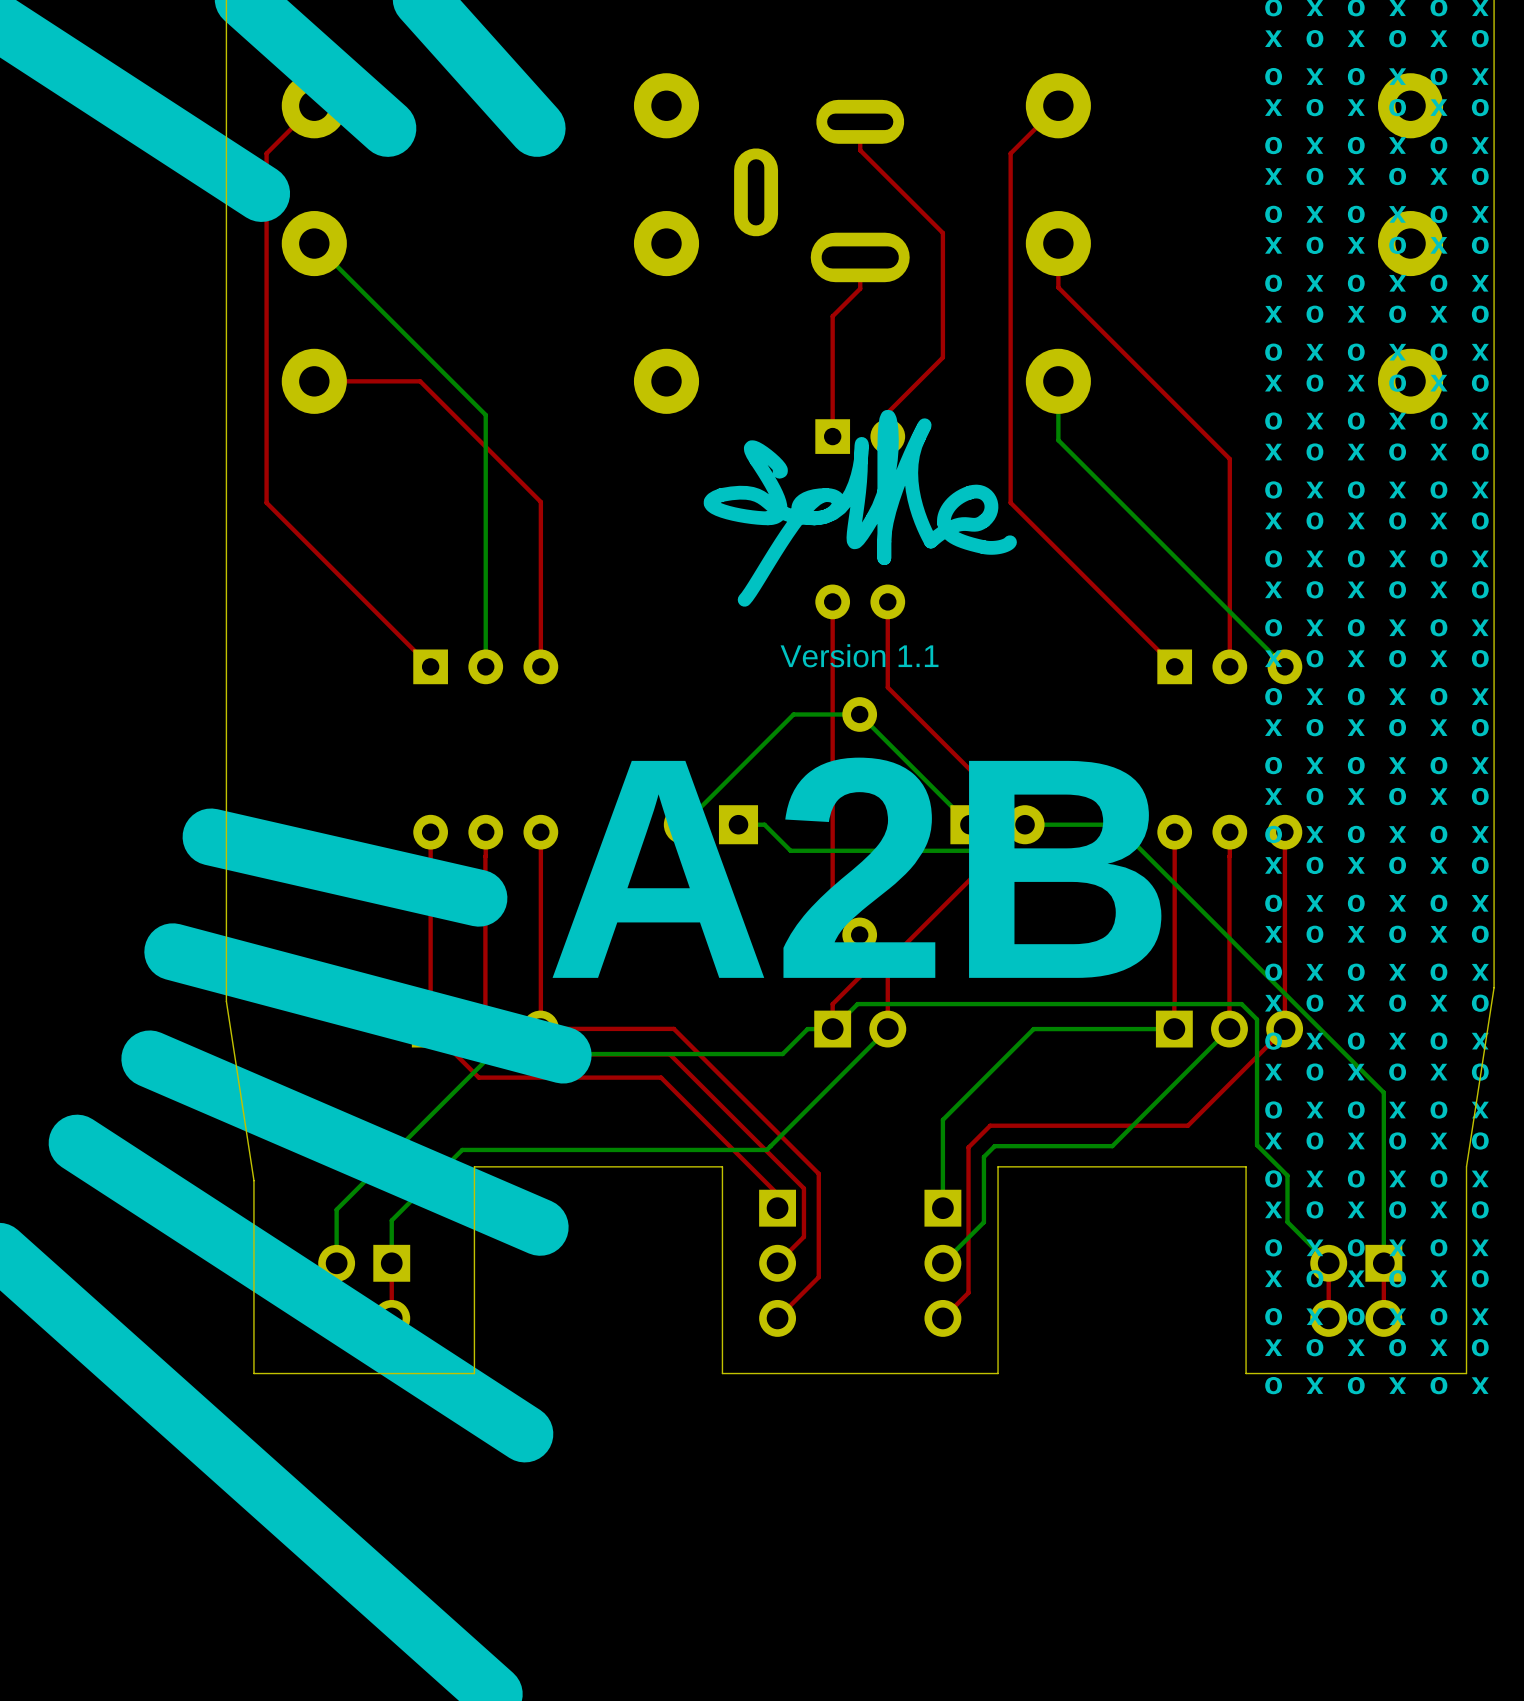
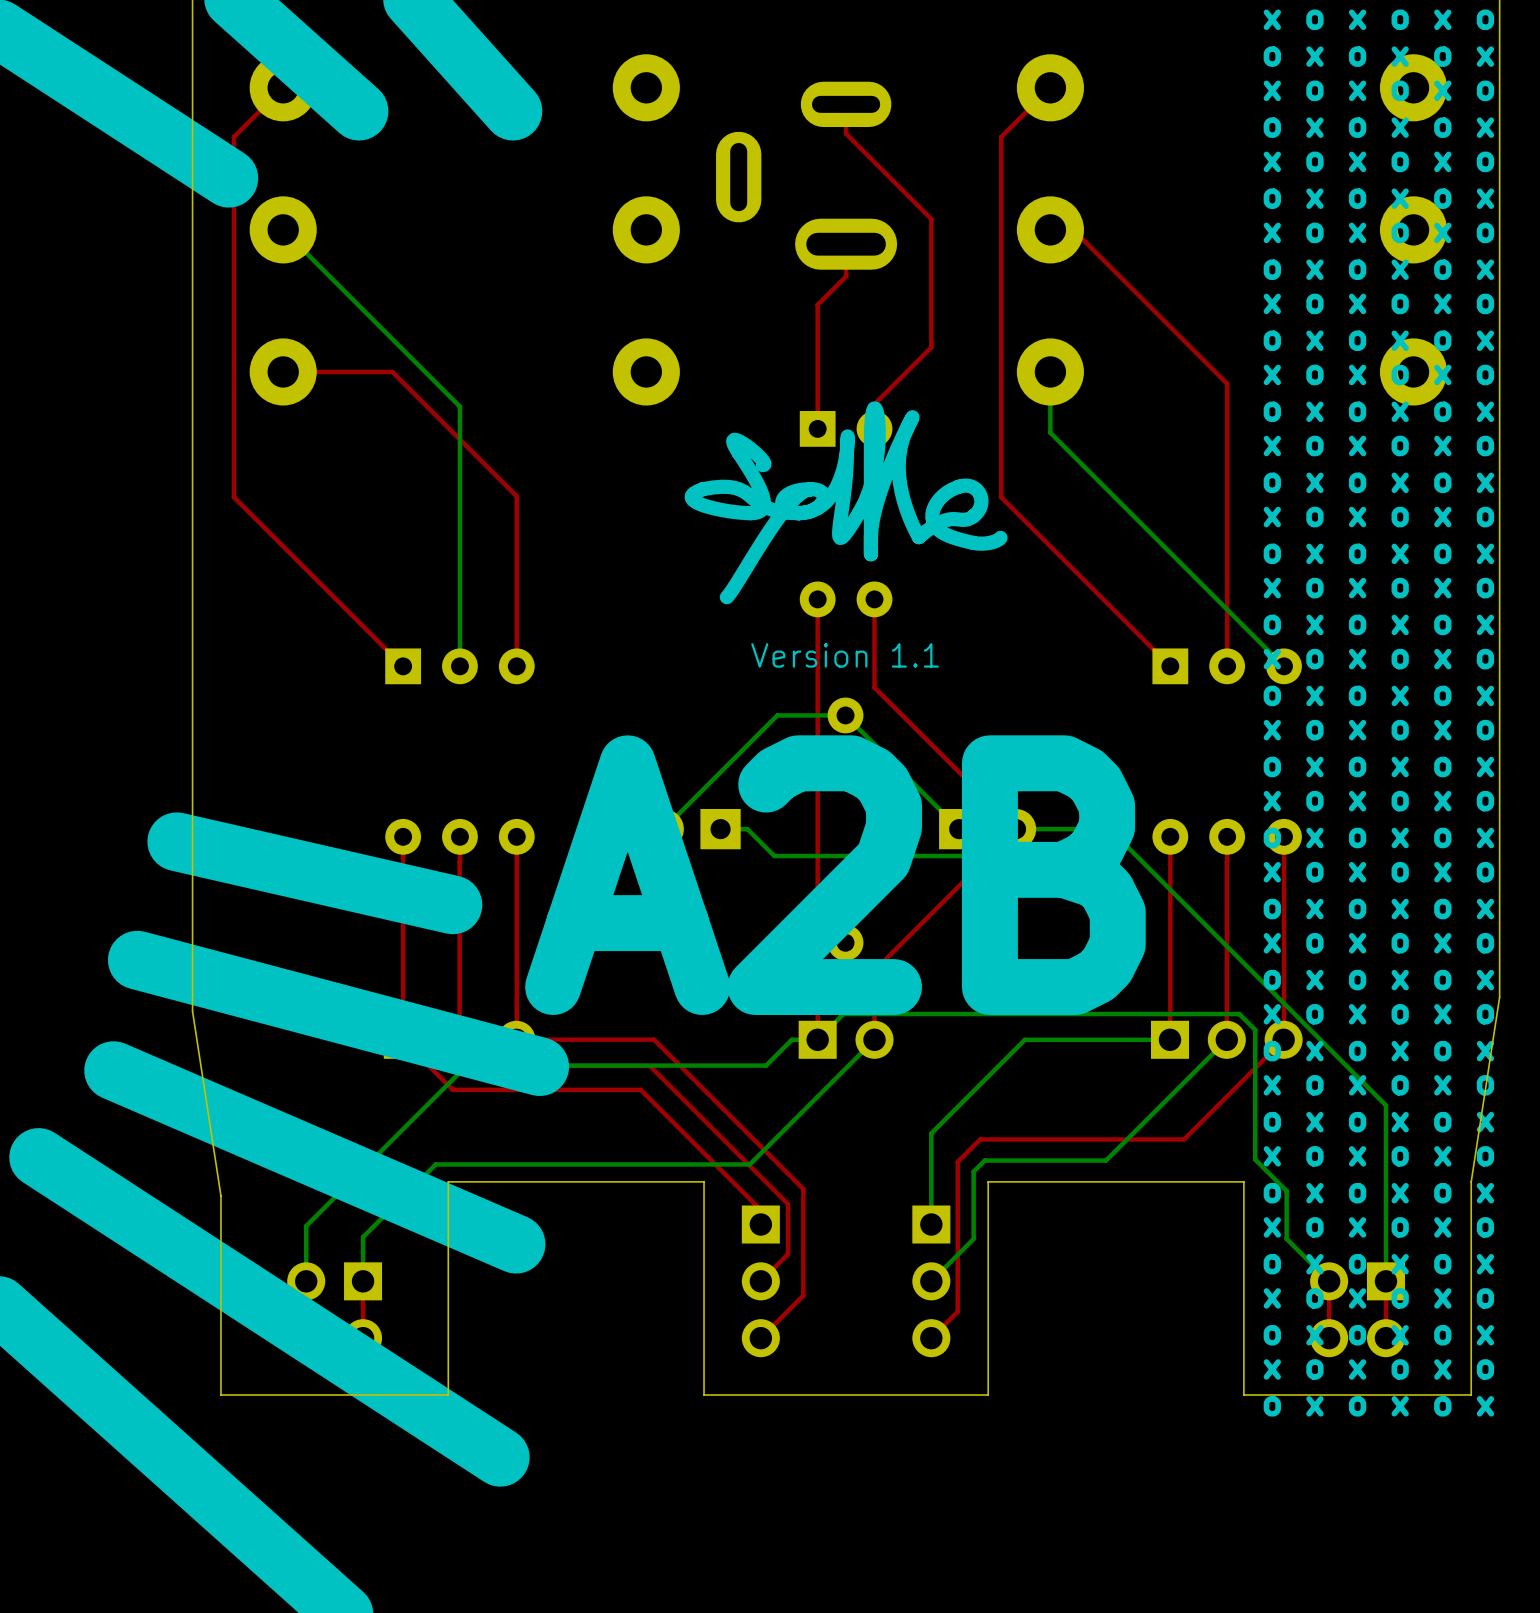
top track: (1058, 243) (1058, 287) (1229, 458) -> (1050, 229) (1073, 229) (1227, 383) (1227, 452)

